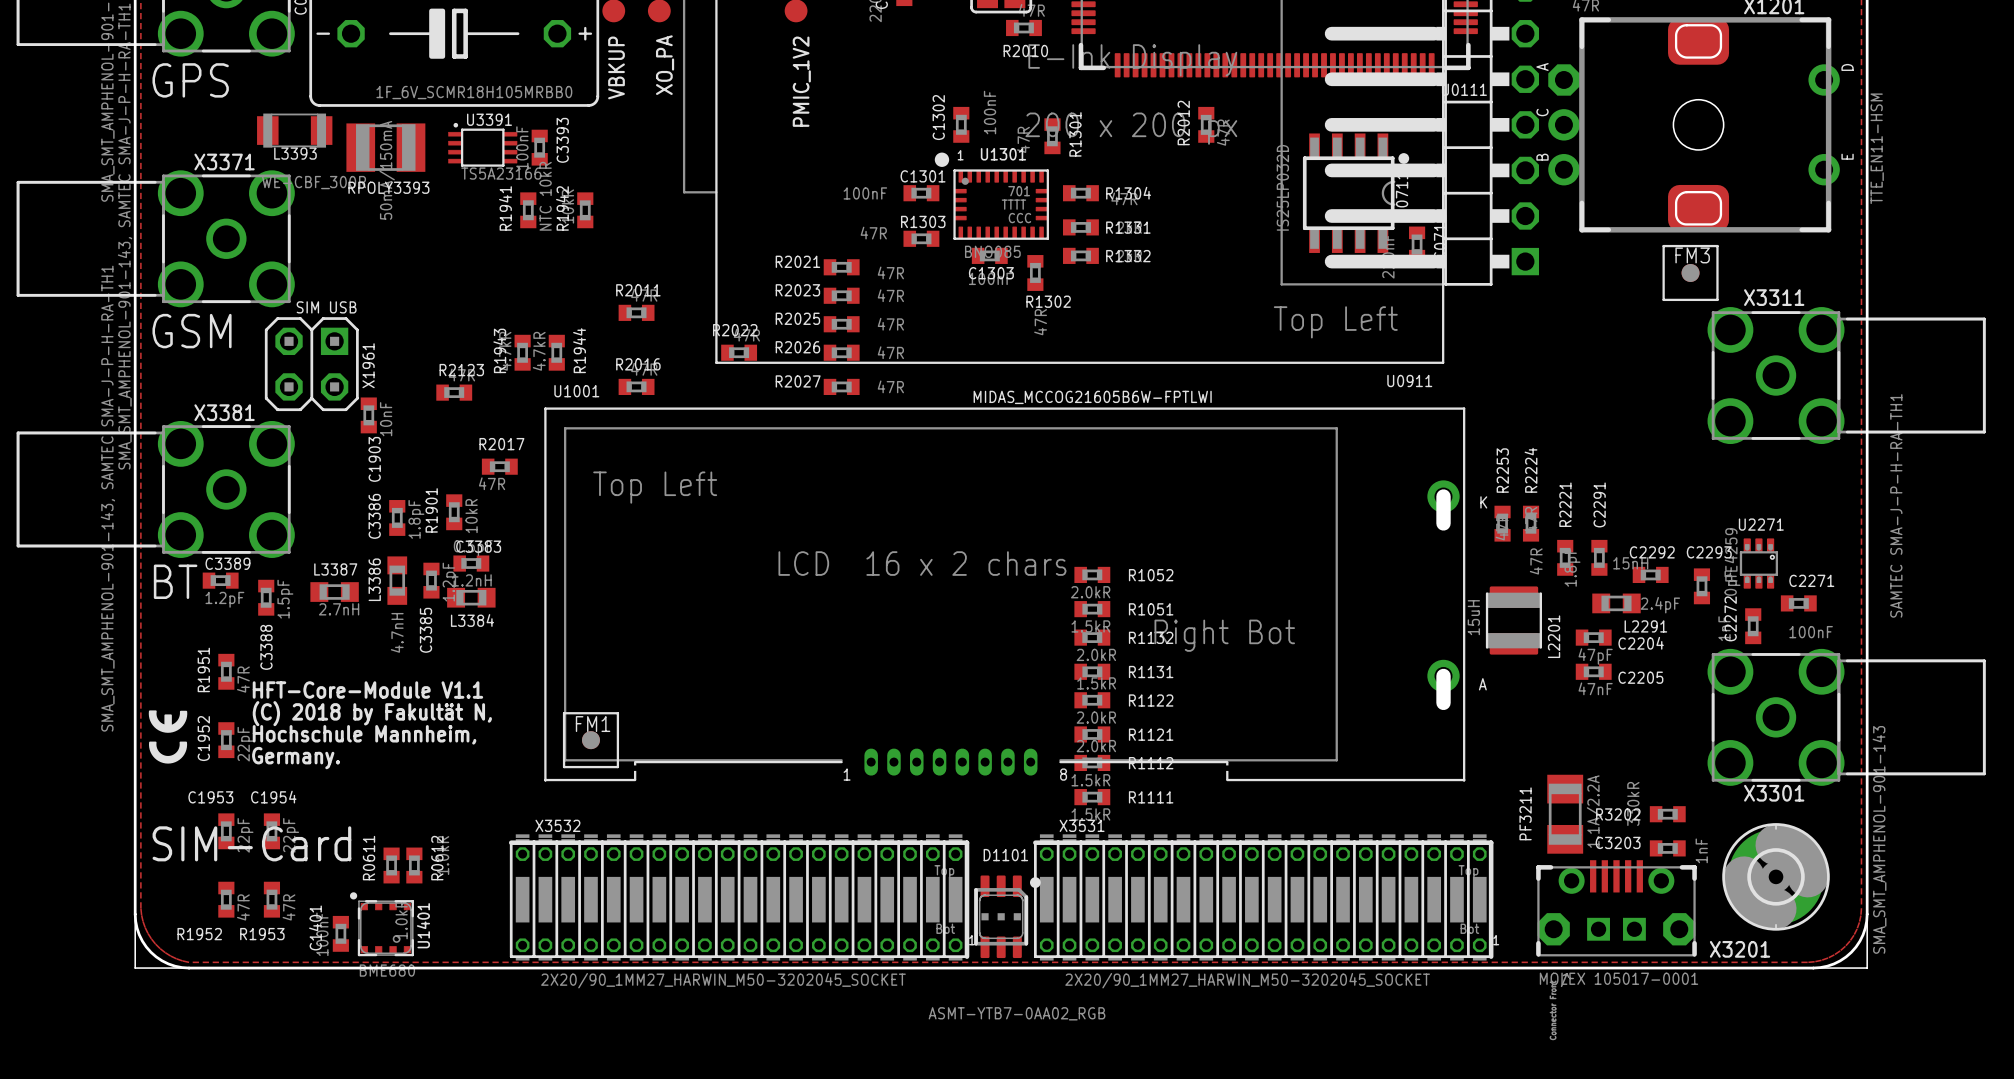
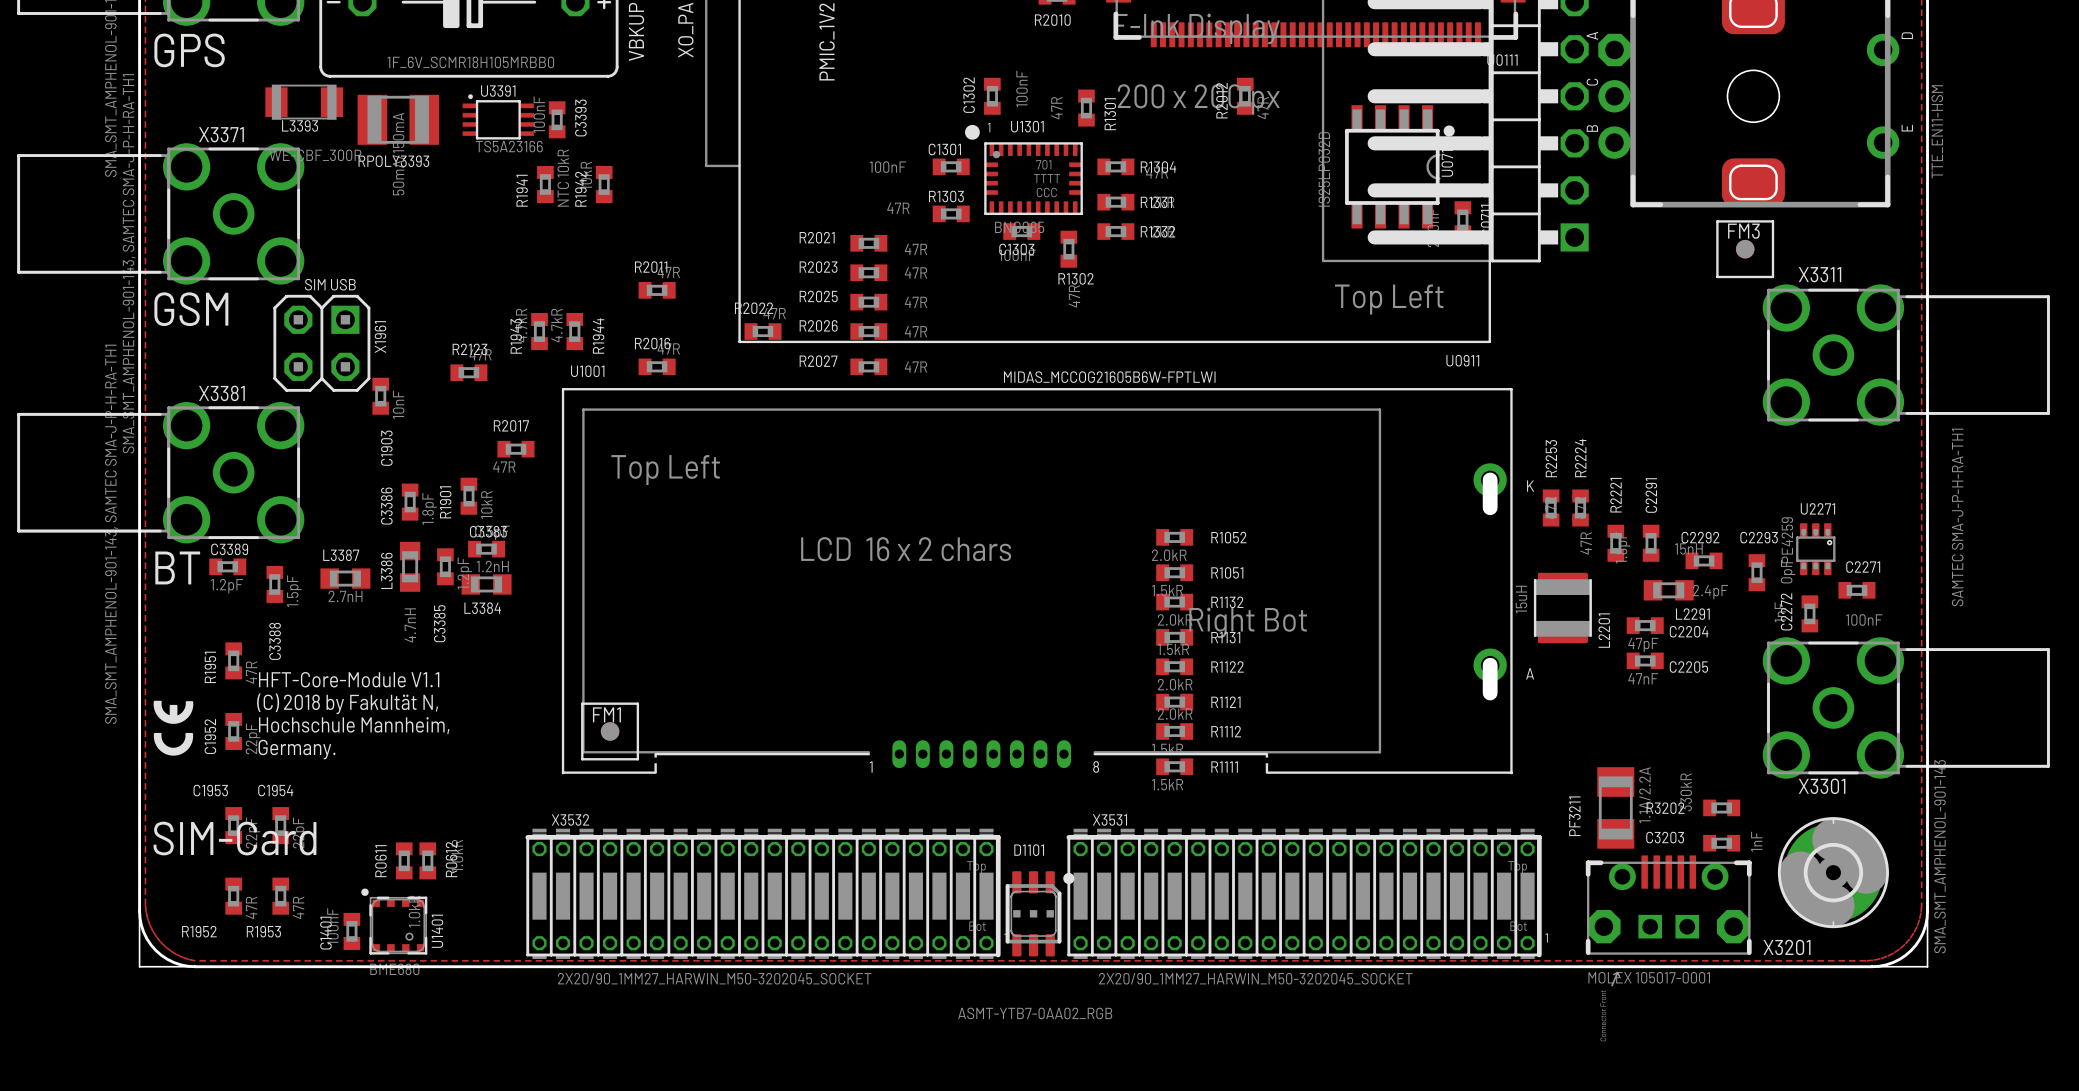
R1052 position: (1092, 574) -> (1174, 537)
R1051 position: (1092, 609) -> (1174, 572)
R1132 position: (1092, 637) -> (1174, 602)
R1131 position: (1092, 671) -> (1174, 637)
R1122 position: (1092, 700) -> (1174, 666)
R1121 position: (1092, 734) -> (1174, 702)
R1112 position: (1092, 762) -> (1174, 731)
R1111 position: (1092, 797) -> (1174, 766)

